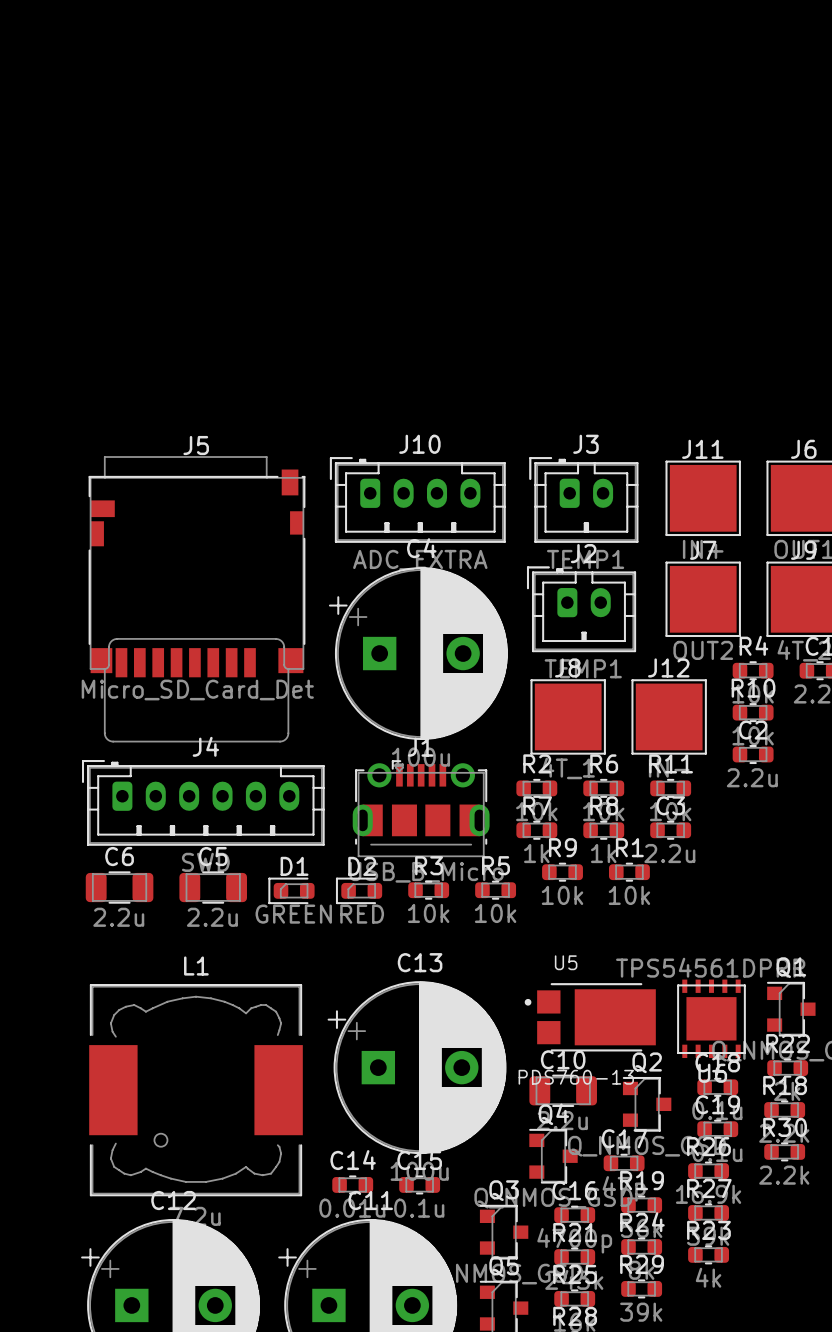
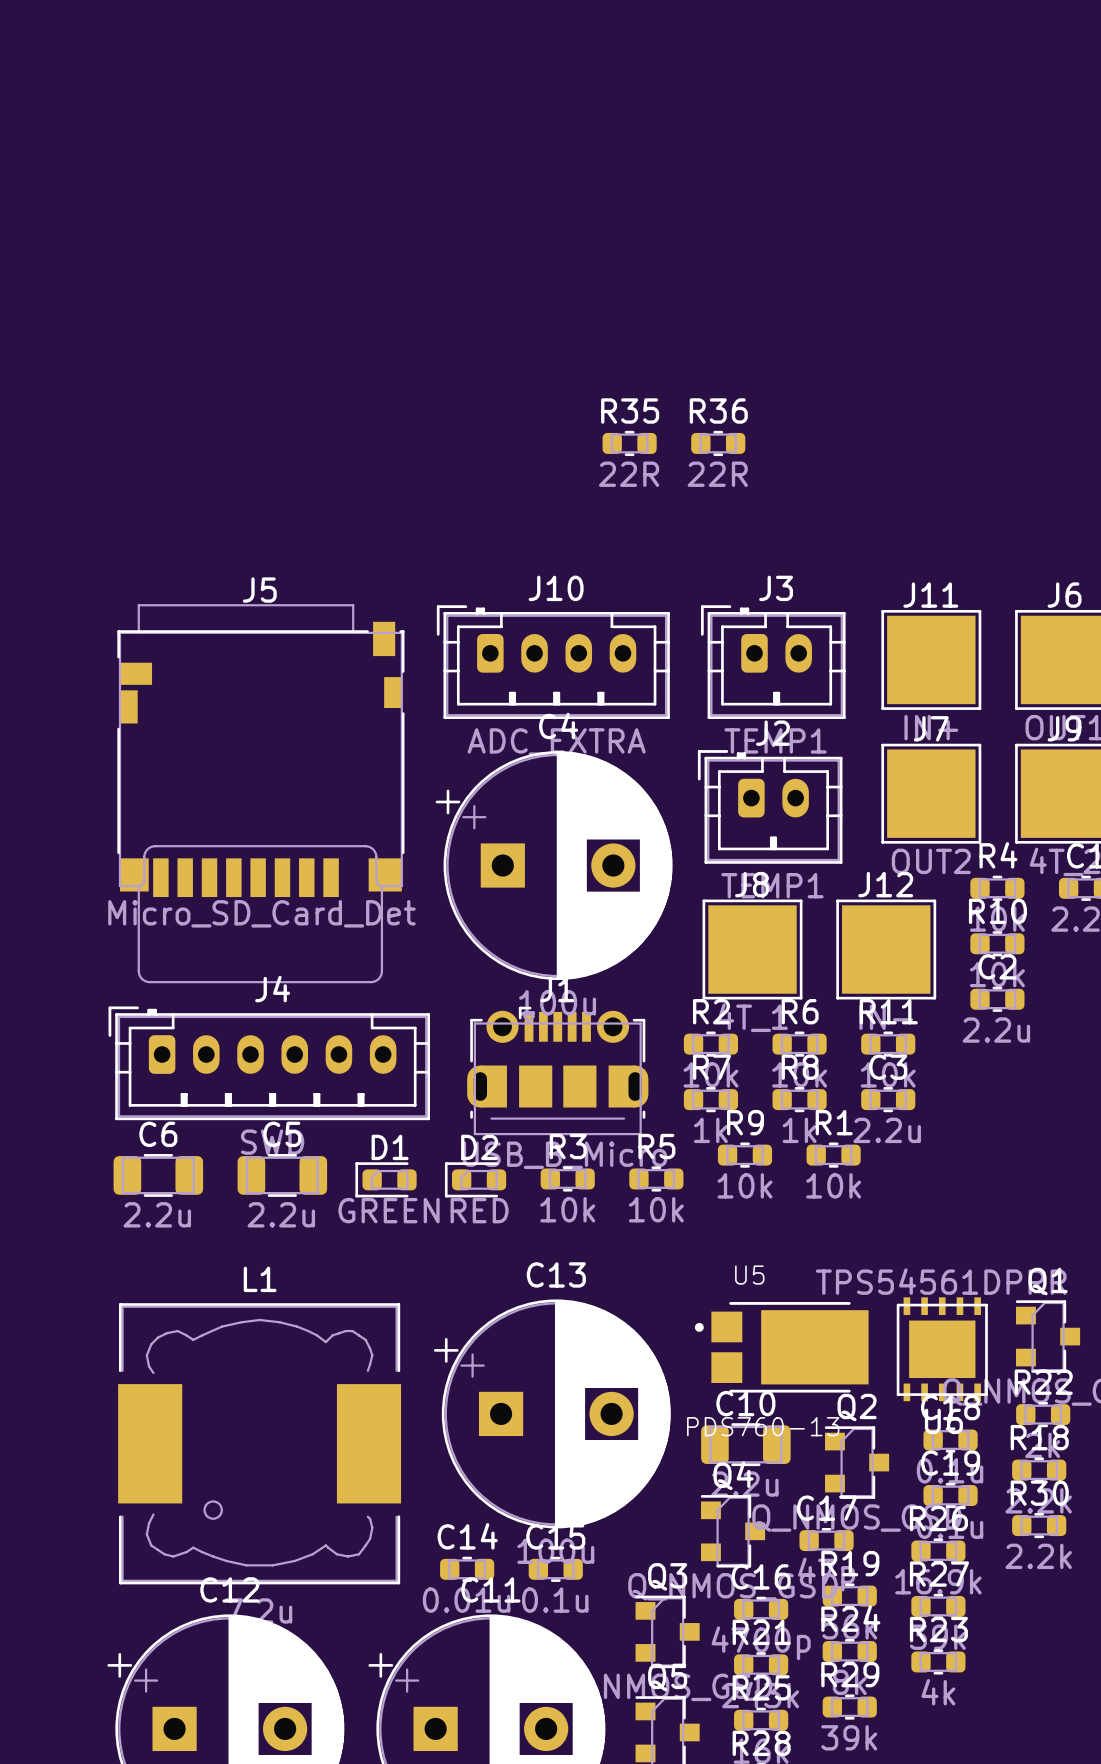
R35: none -> 22R (629, 443)
R36: none -> 22R (718, 443)

